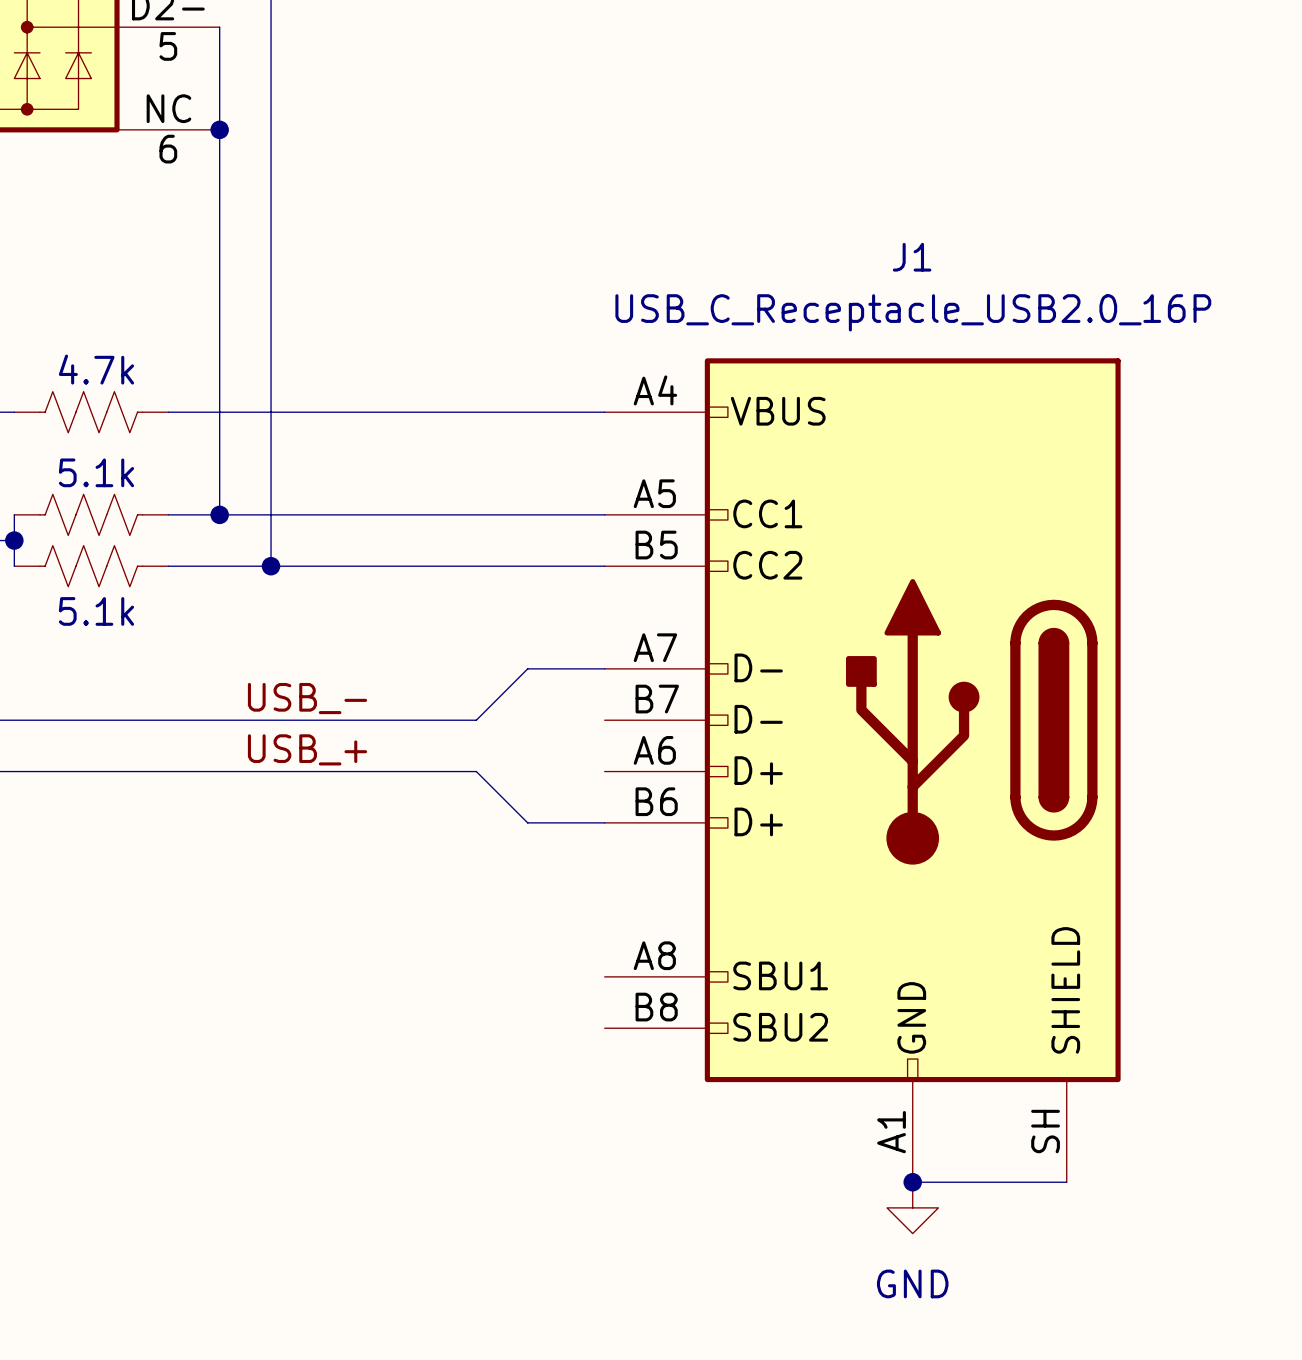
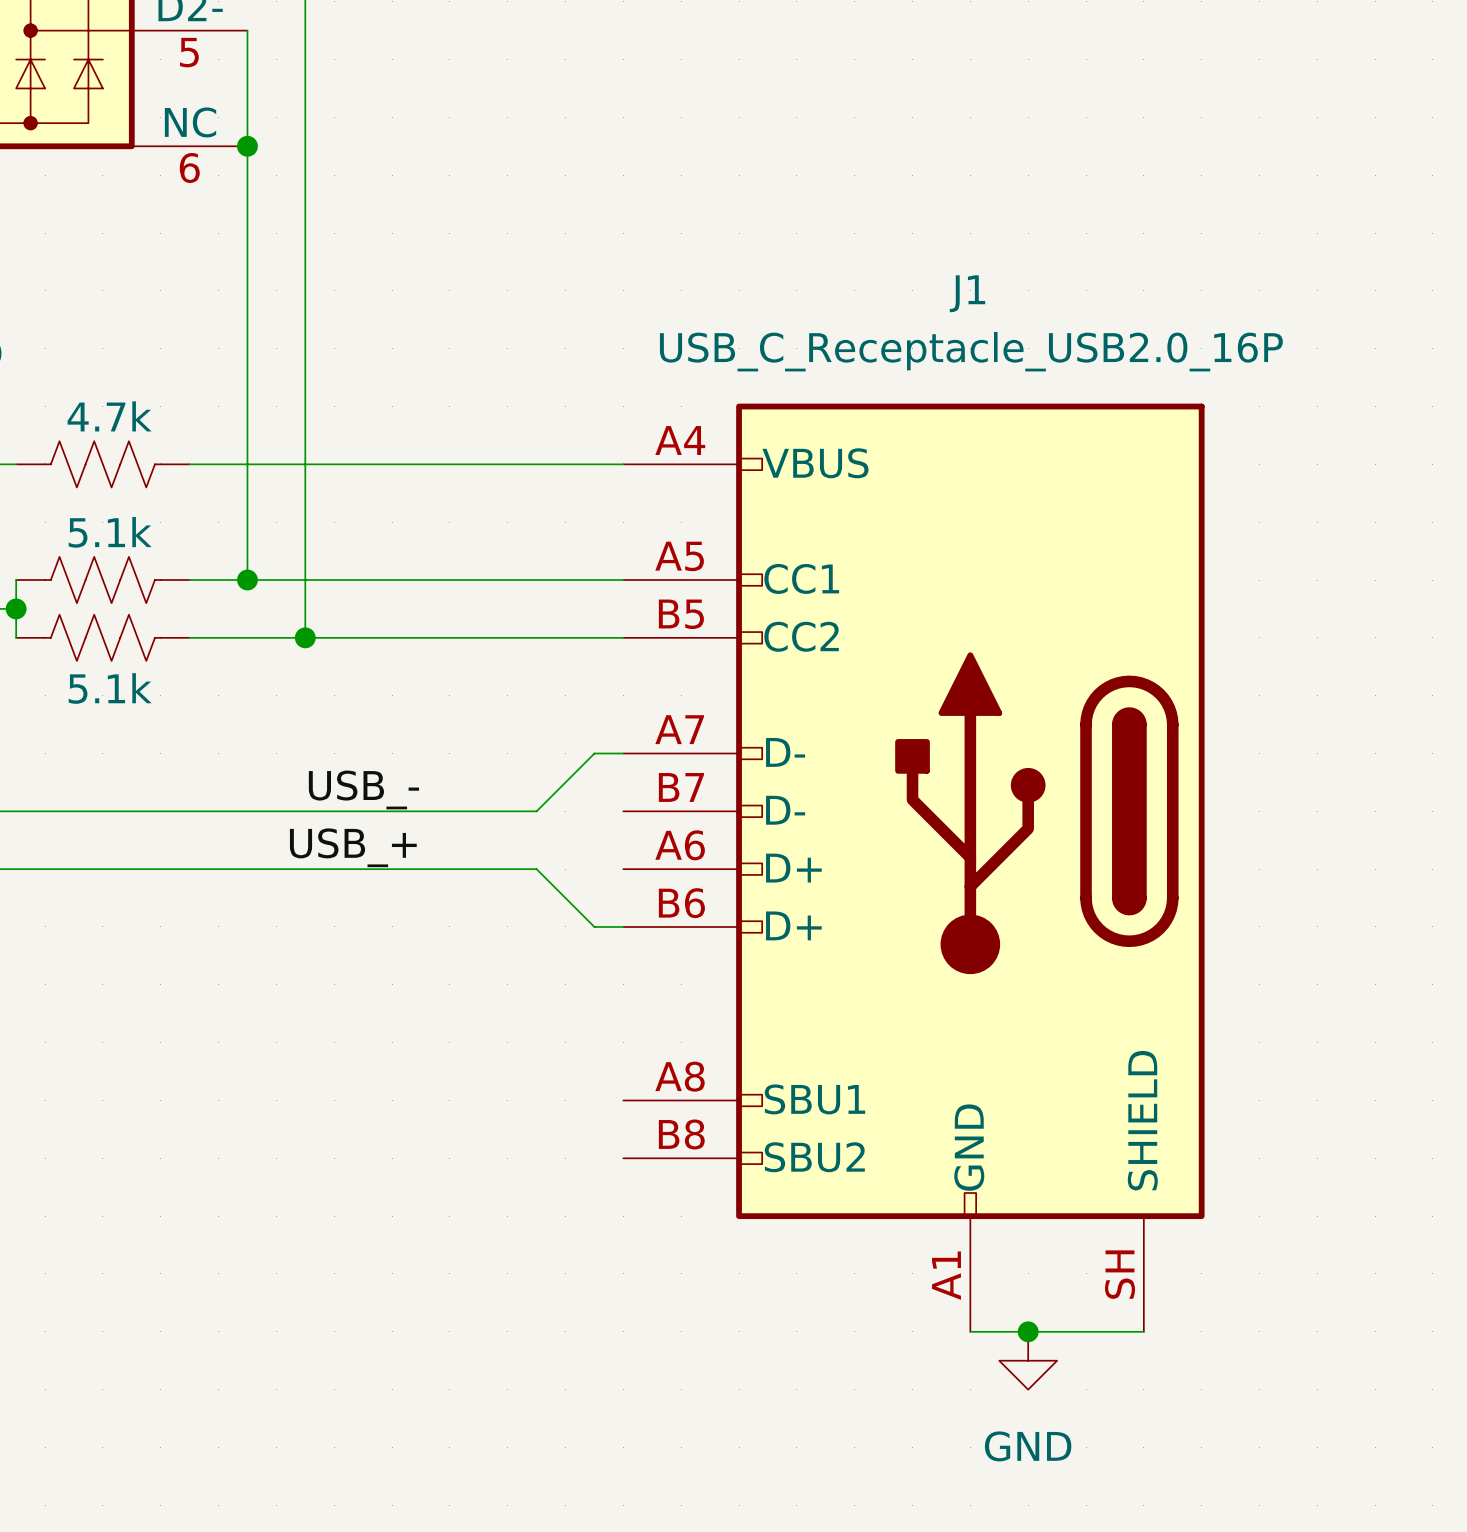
J1 position: (862, 770) -> (913, 867)
wire: (1015, 1182) (1066, 1182) -> (970, 1331) (1028, 1331)

